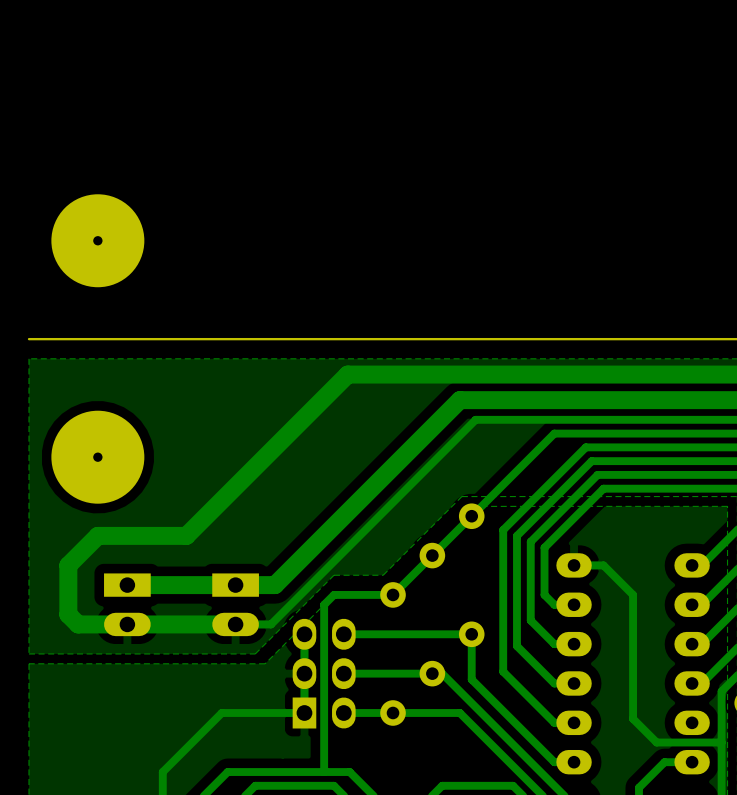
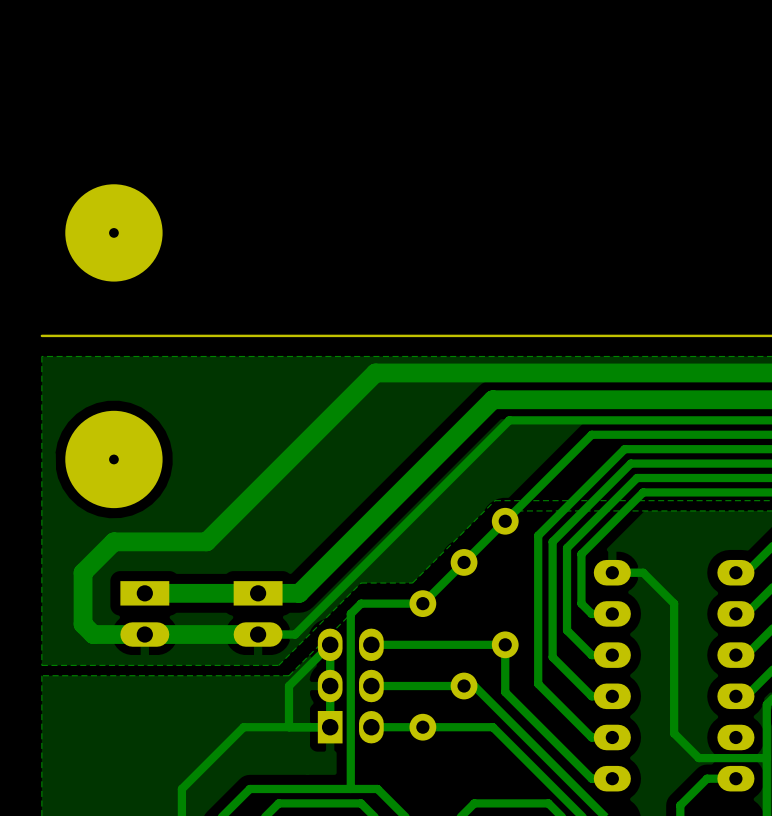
track: none -> (330, 644) (289, 686) (289, 727)

